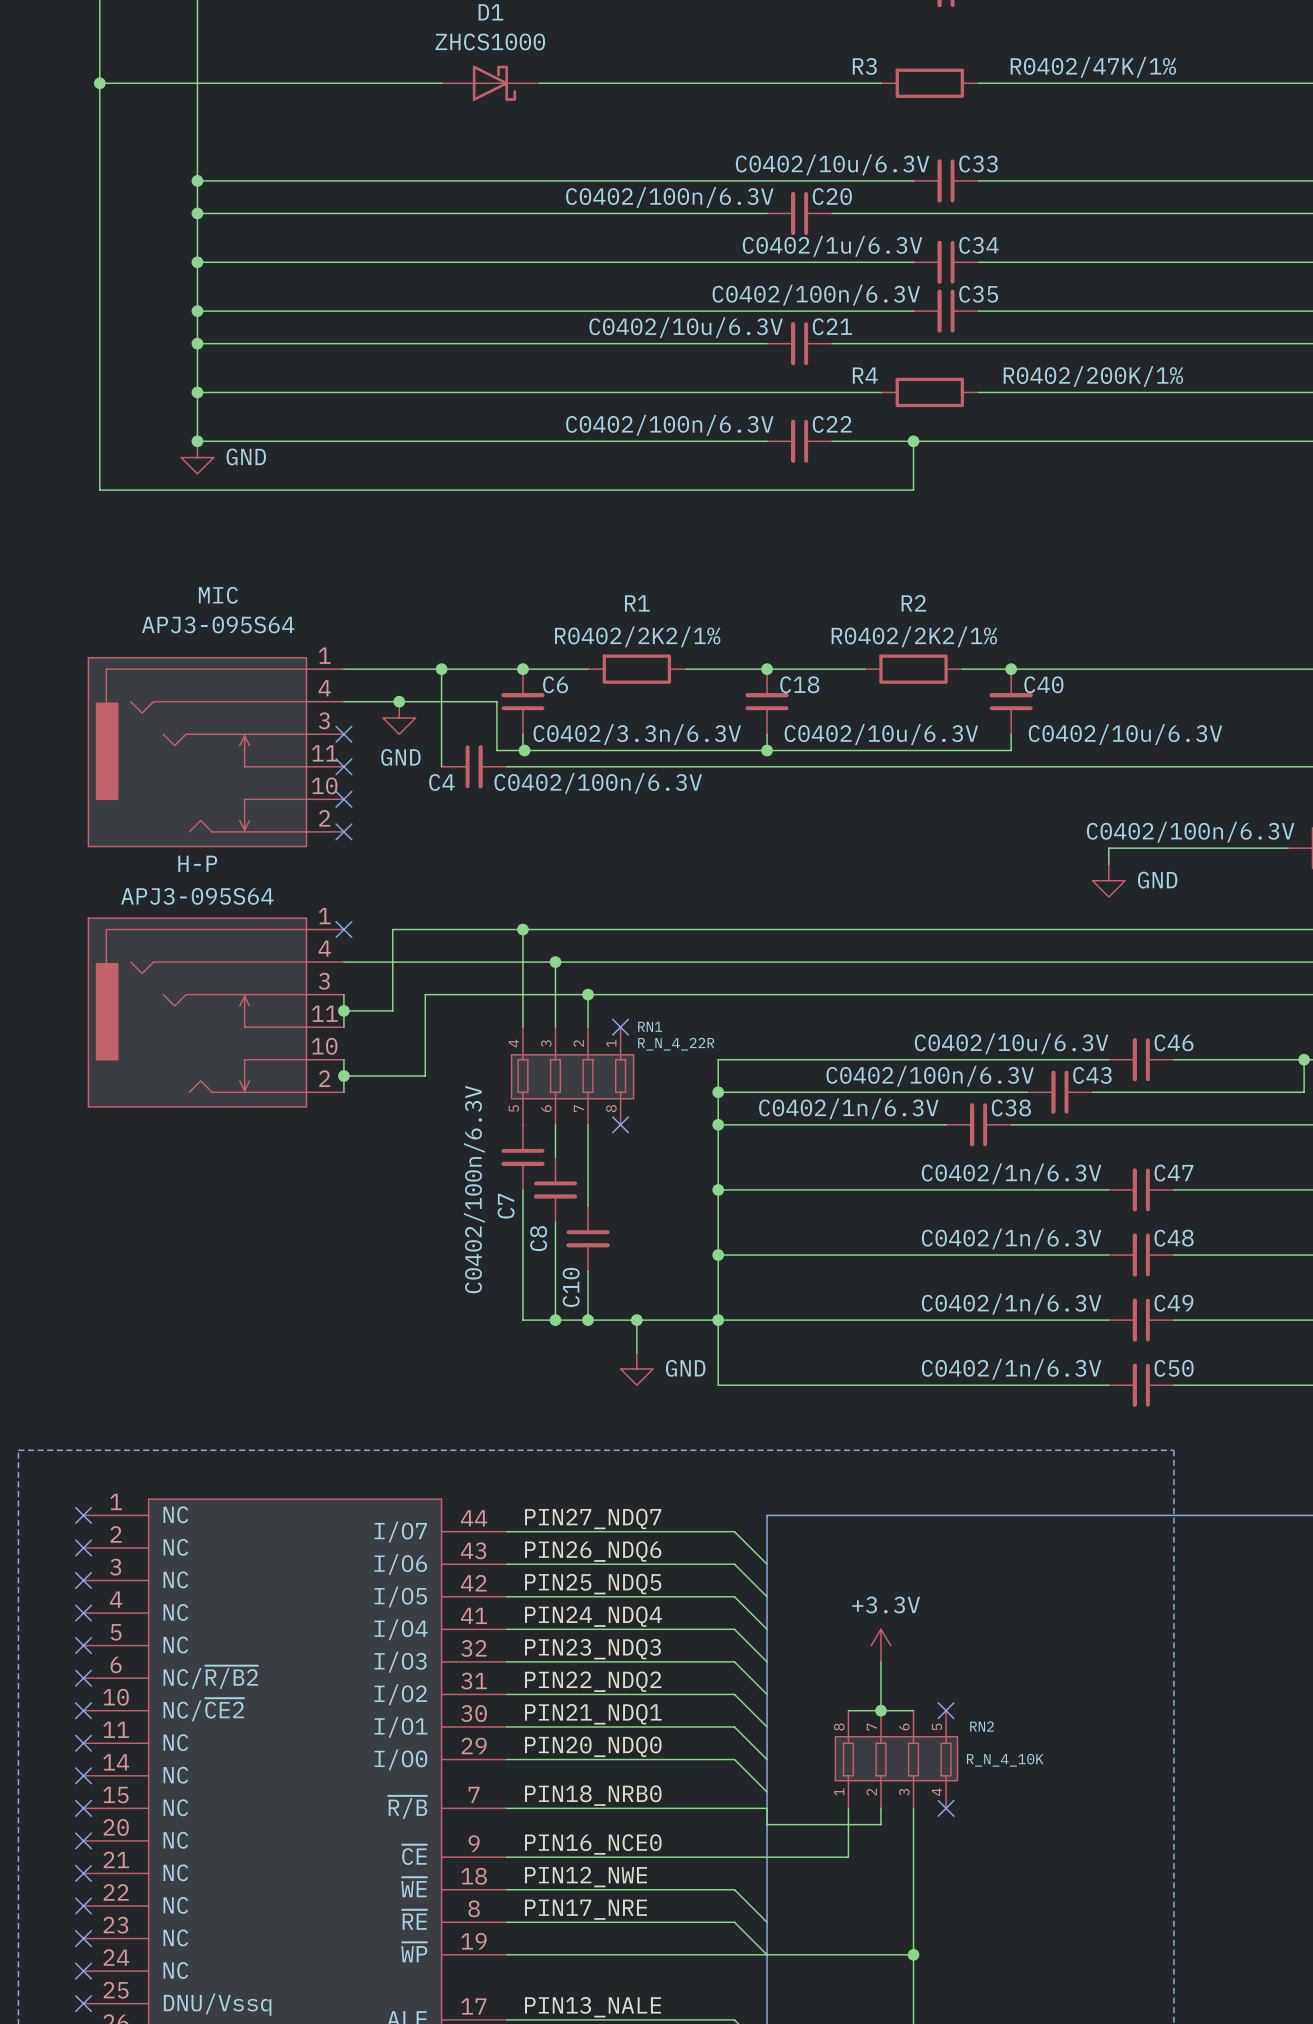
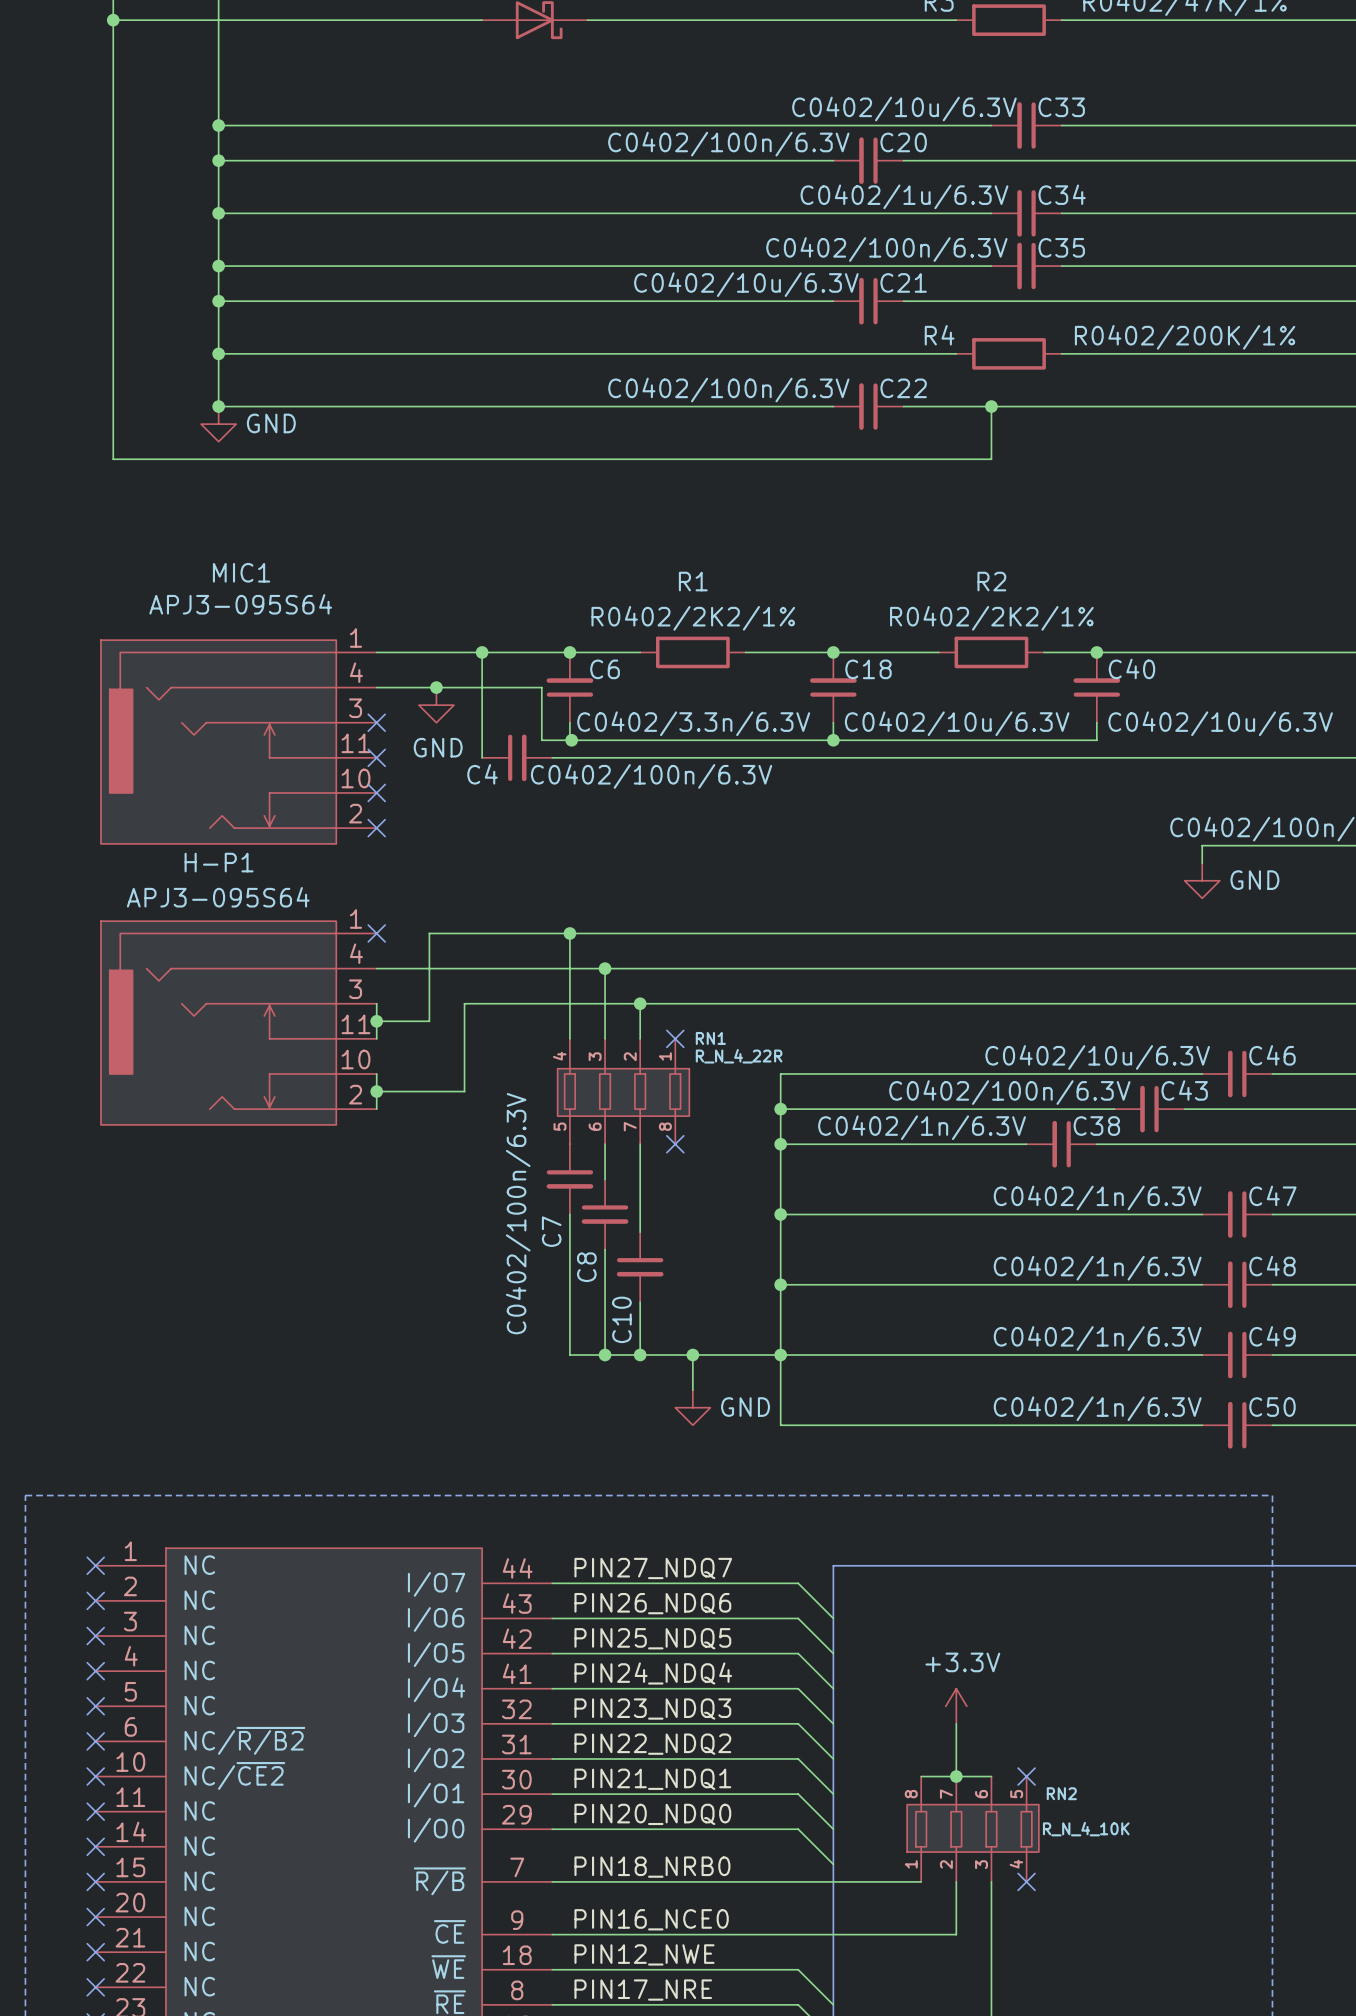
MIC name: MIC (218, 595) -> MIC1 (241, 572)
H-P name: H-P (197, 863) -> H-P1 (219, 862)
wire: (767, 1808) (767, 1824) (880, 1824) -> (833, 1881) (921, 1881)
wire: (848, 1808) (848, 1857) -> (956, 1899) (956, 1934) (921, 1934)

